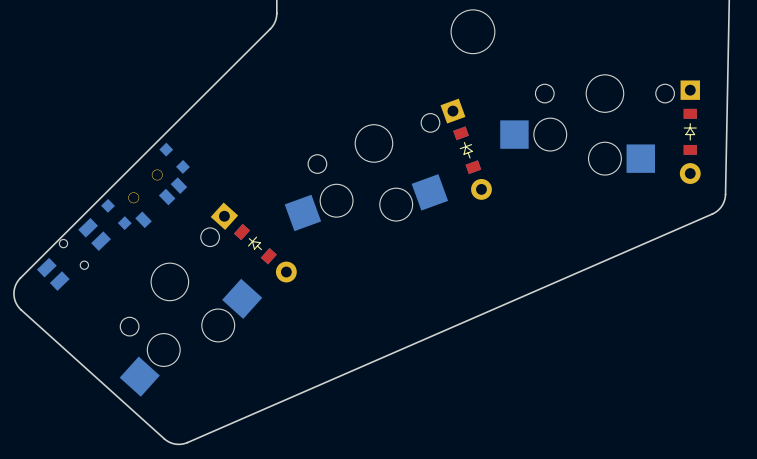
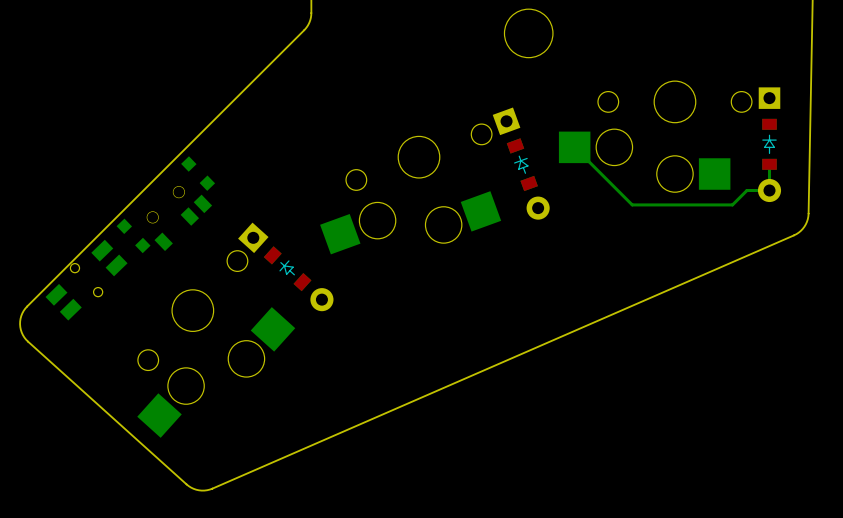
bottom track: none -> (574, 147) (632, 204) (732, 204) (746, 190) (769, 190) (769, 164)

